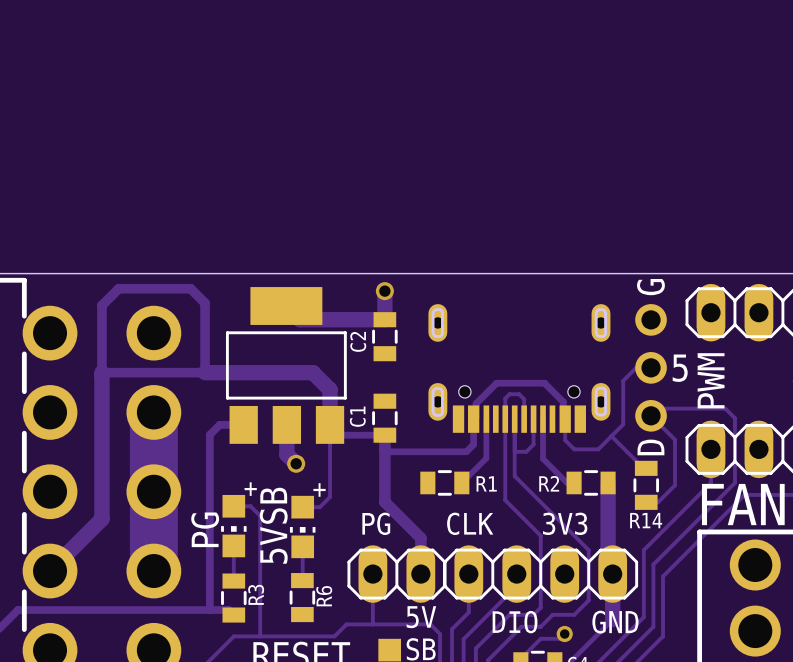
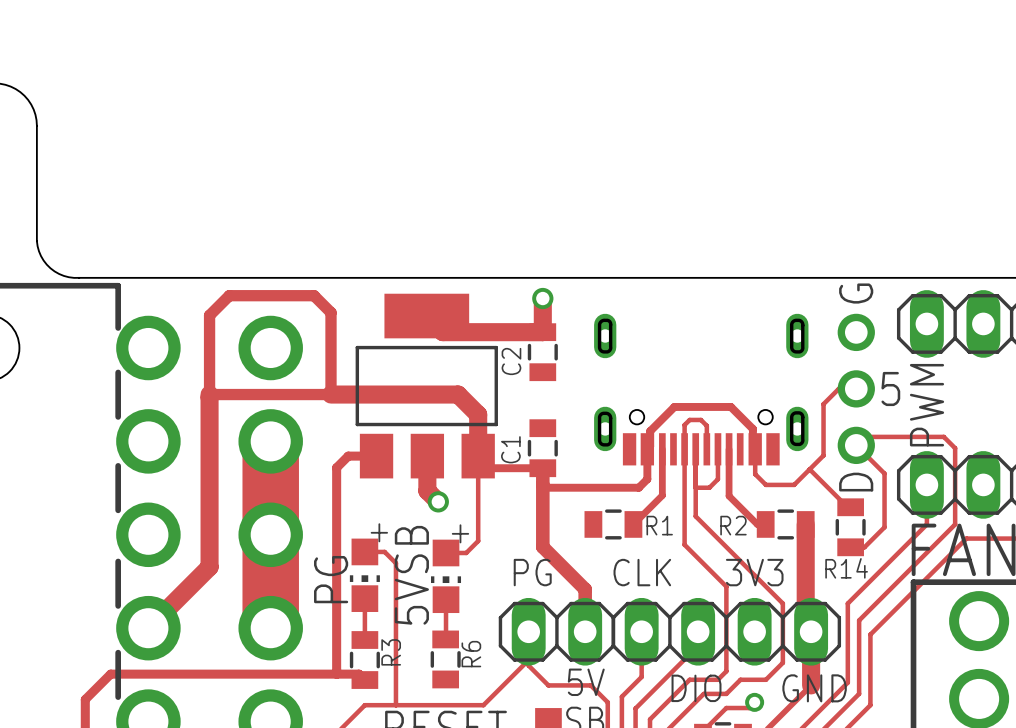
track: none -> (528, 660) (497, 691)
track: (372, 602) (372, 624) -> none
track: (346, 624) (430, 624) -> (528, 665) (548, 685) (590, 685) (596, 691)

